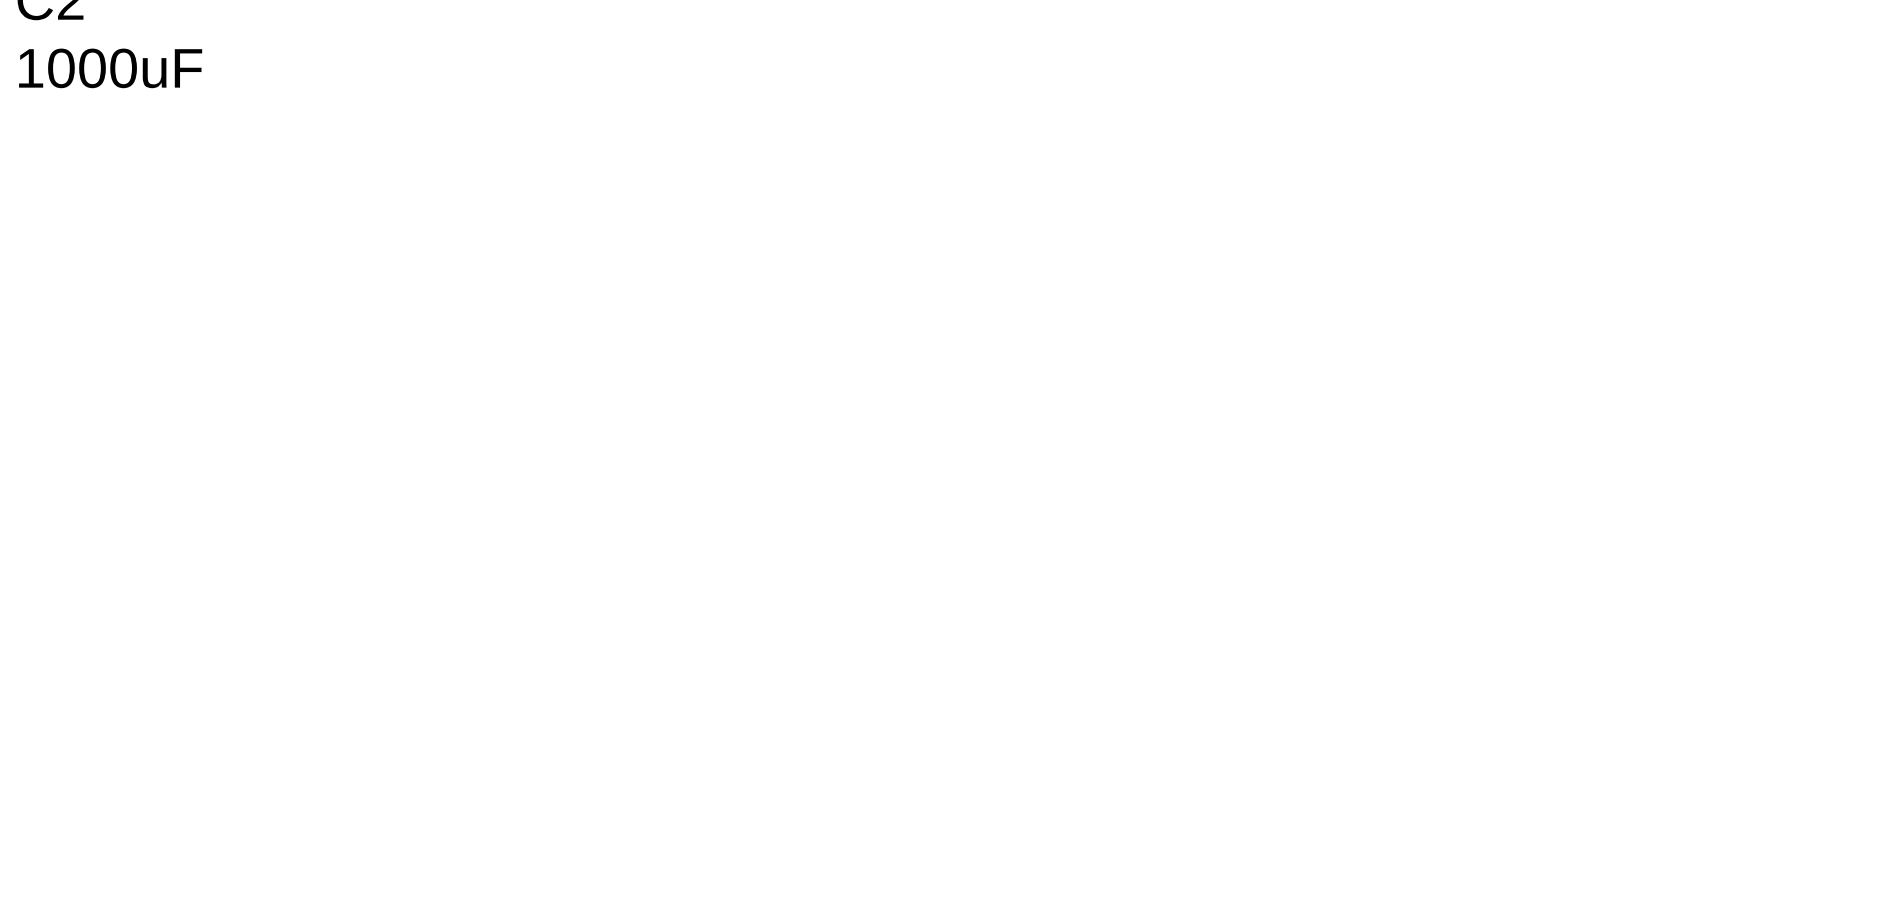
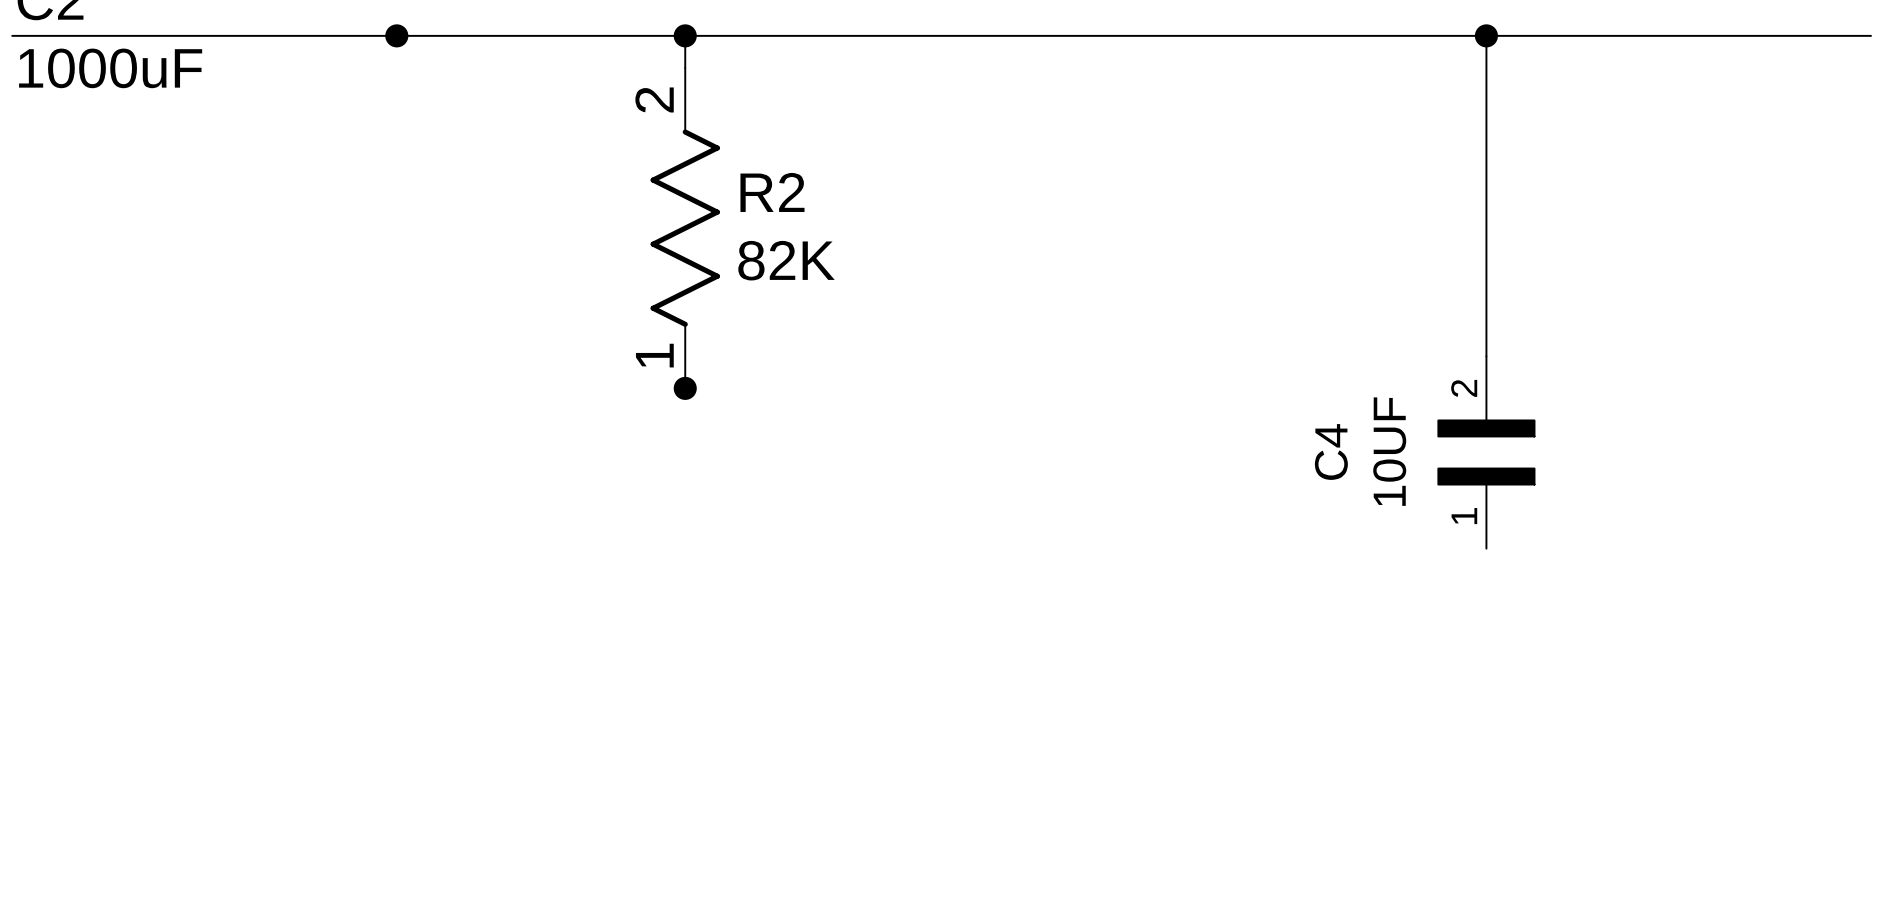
wire: none -> (12, 35) (1871, 35)
junction: none -> (396, 35)
wire: none -> (685, 35) (685, 67)
junction: none -> (685, 35)
wire: none -> (1486, 35) (1486, 356)
junction: none -> (1486, 35)
R2: none -> 82K (685, 228)
junction: none -> (685, 388)
C4: none -> 10UF (1486, 452)

